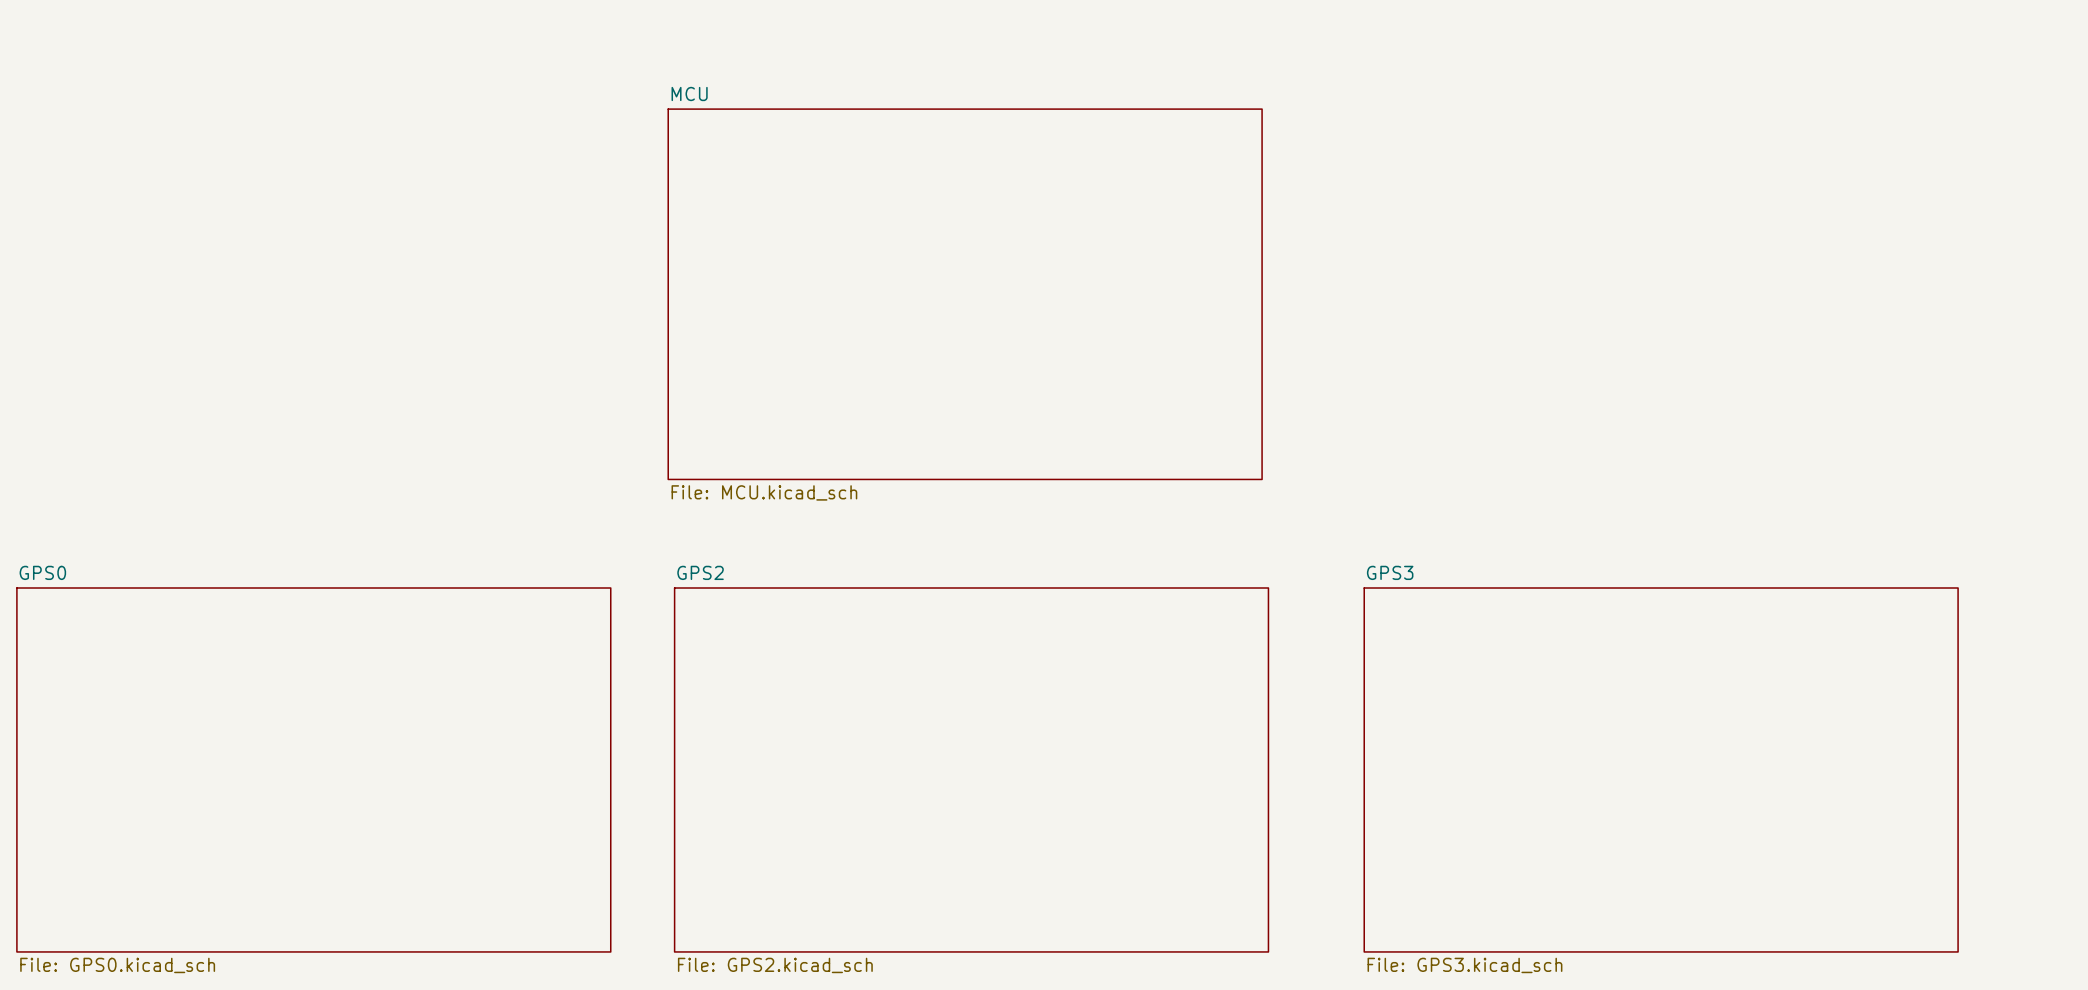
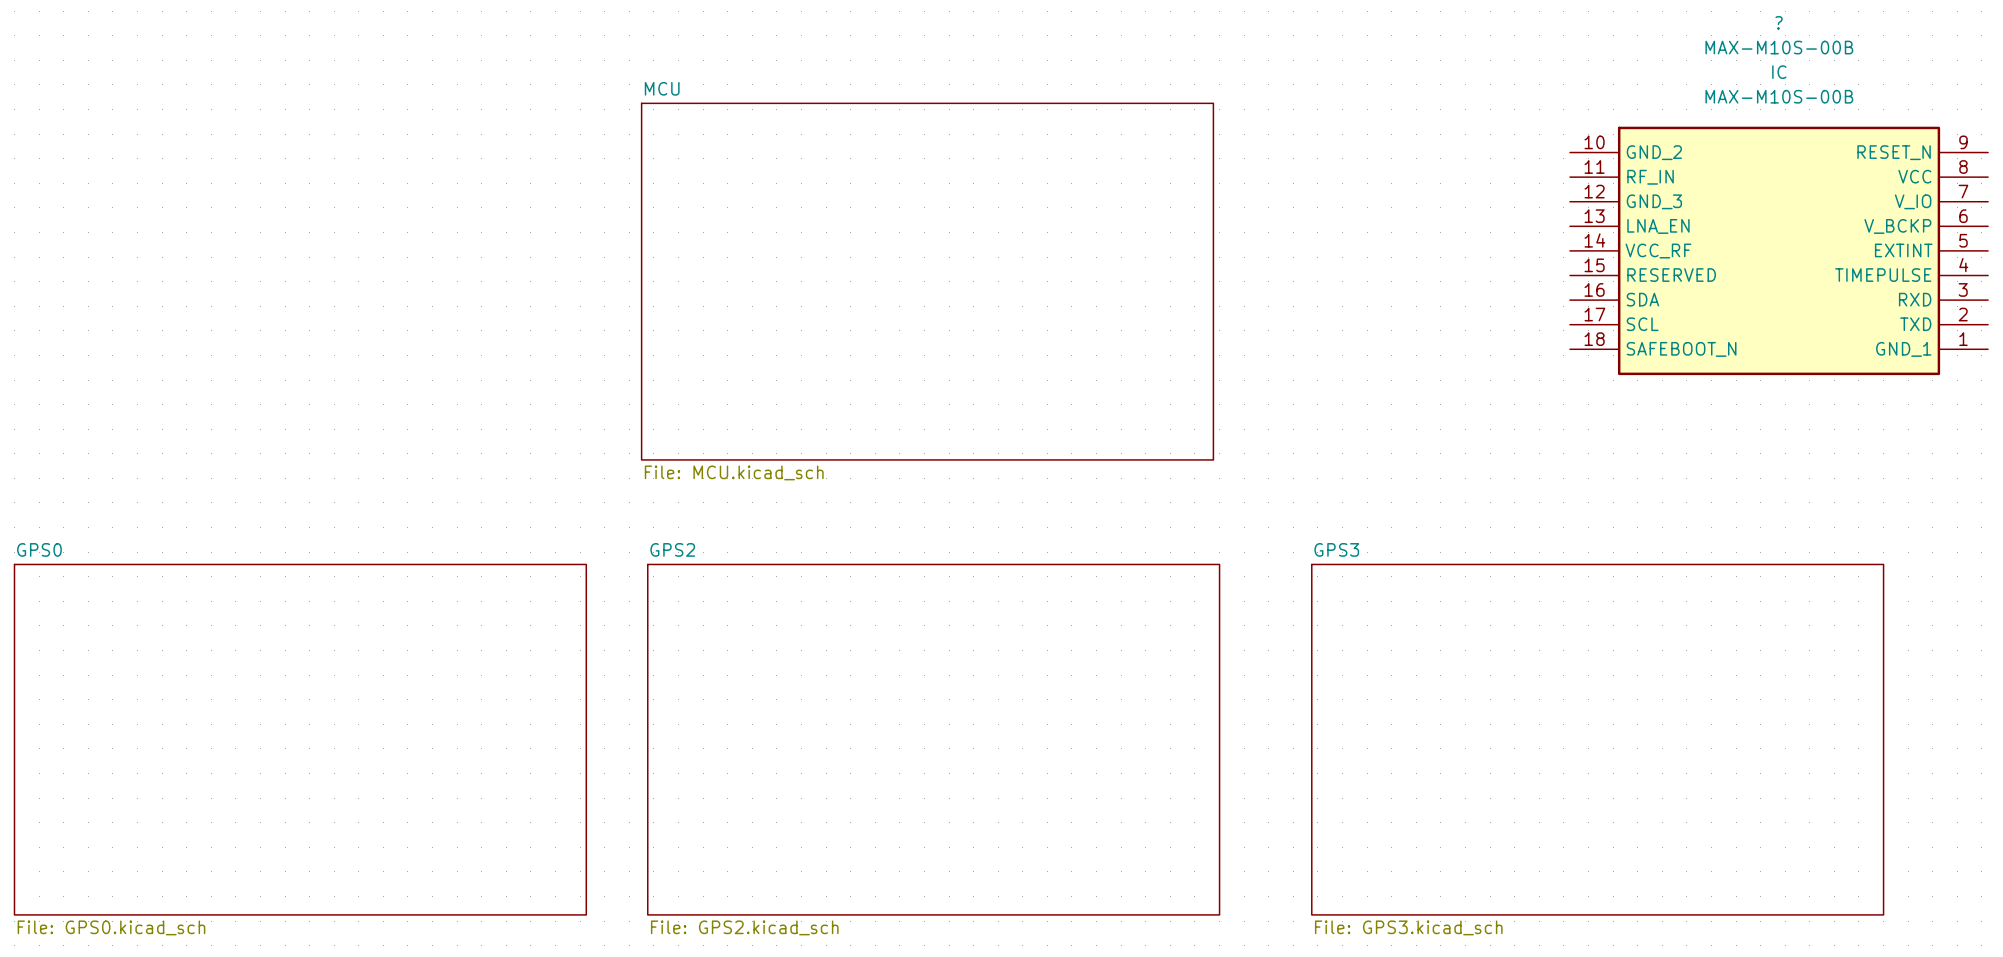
part: none -> MAX-M10S-00B (1779, 250)

